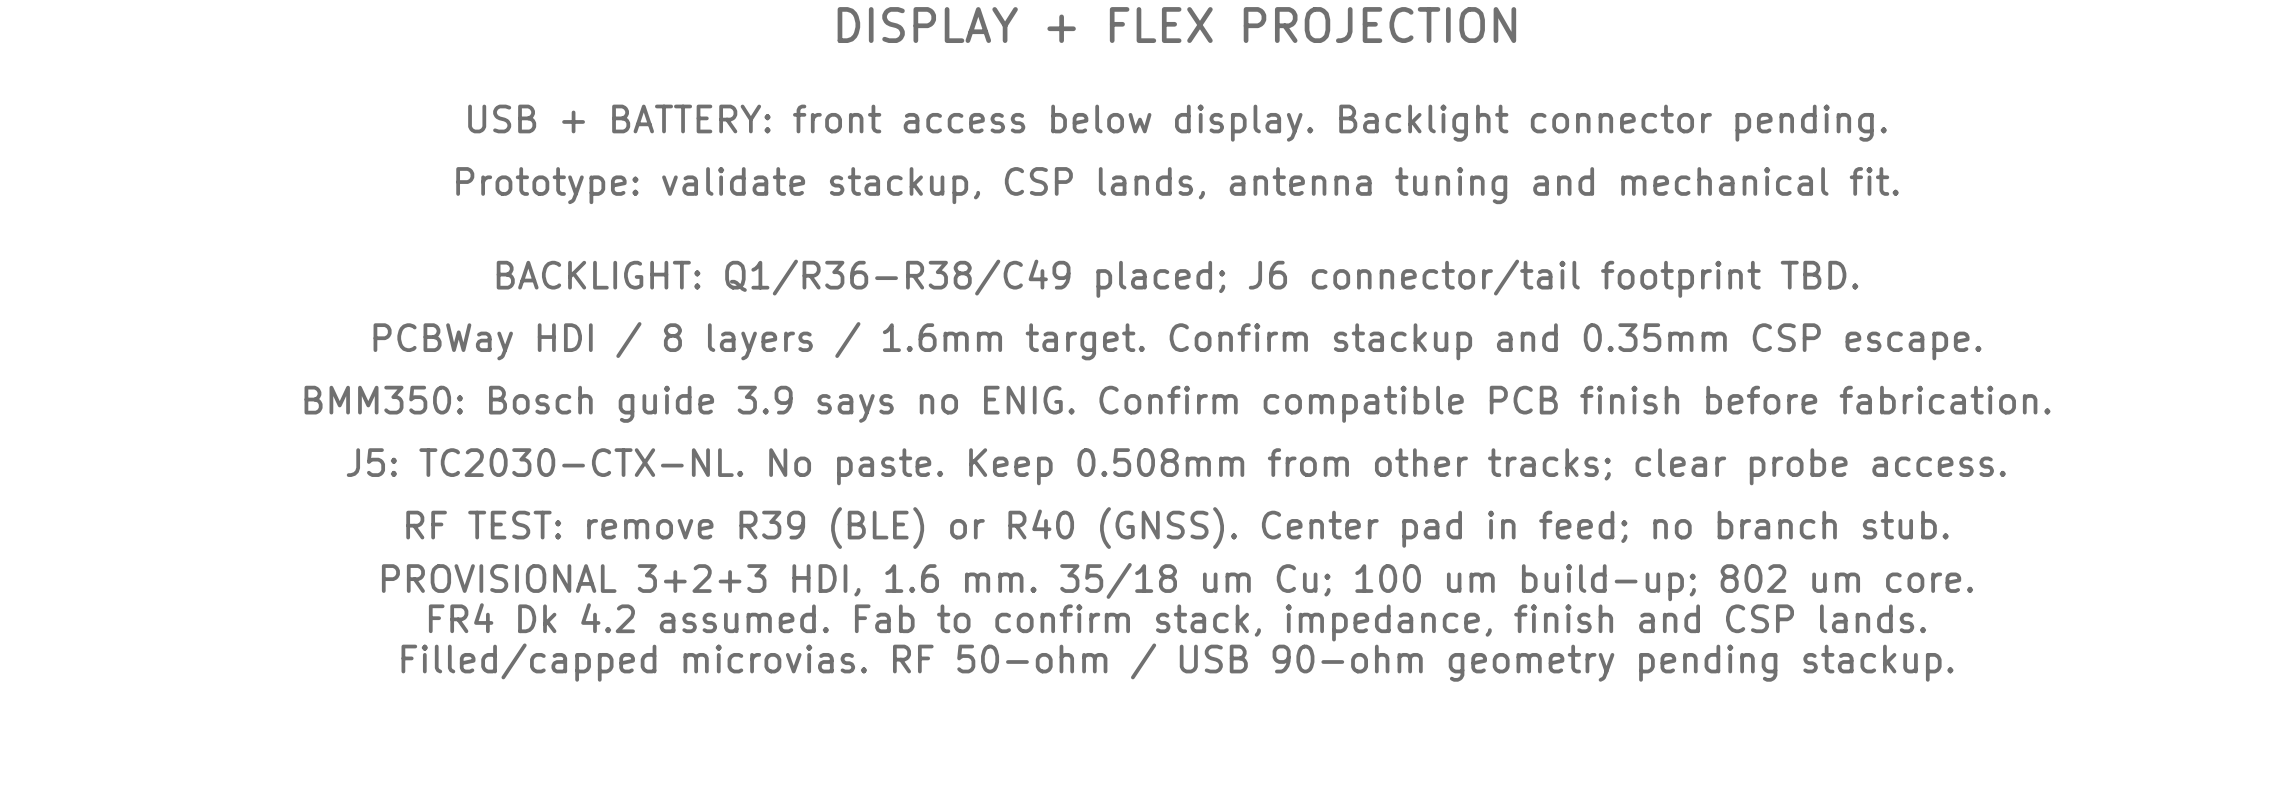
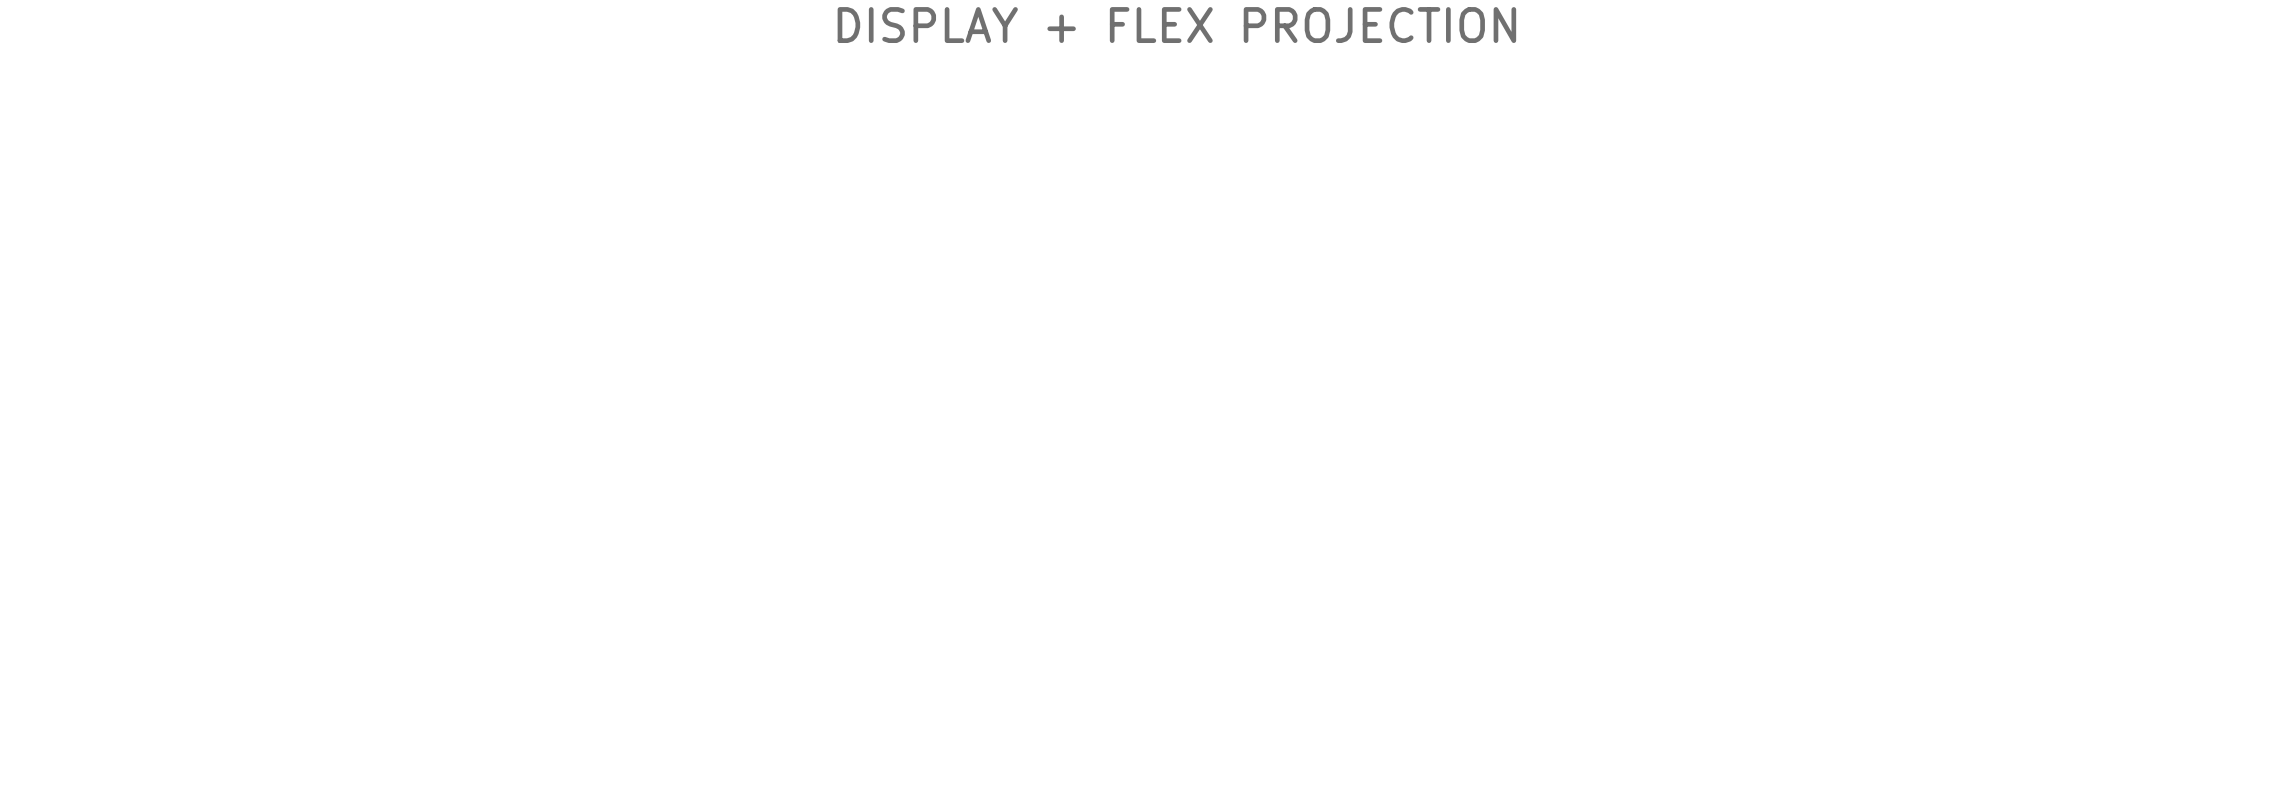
text: USB + BATTERY: front access below display. Backlight connector pending. (1177, 123) -> none
text: Prototype: validate stackup, CSP lands, antenna tuning and mechanical fit. (1177, 185) -> none
text: BACKLIGHT: Q1/R36-R38/C49 placed; J6 connector/tail footprint TBD. (1177, 278) -> none
text: PCBWay HDI / 8 layers / 1.6mm target. Confirm stackup and 0.35mm CSP escape. (1177, 341) -> none
text: BMM350: Bosch guide 3.9 says no ENIG. Confirm compatible PCB finish before fabrication. (1177, 404) -> none
text: J5: TC2030-CTX-NL. No paste. Keep 0.508mm from other tracks; clear probe access. (1176, 466) -> none
text: RF TEST: remove R39 (BLE) or R40 (GNSS). Center pad in feed; no branch stub. (1177, 528) -> none
text: PROVISIONAL 3+2+3 HDI, 1.6 mm. 35/18 um Cu; 100 um build-up; 802 um core. (1177, 582) -> none
text: FR4 Dk 4.2 assumed. Fab to confirm stack, impedance, finish and CSP lands. (1177, 622) -> none
text: Filled/capped microvias. RF 50-ohm / USB 90-ohm geometry pending stackup. (1177, 662) -> none

